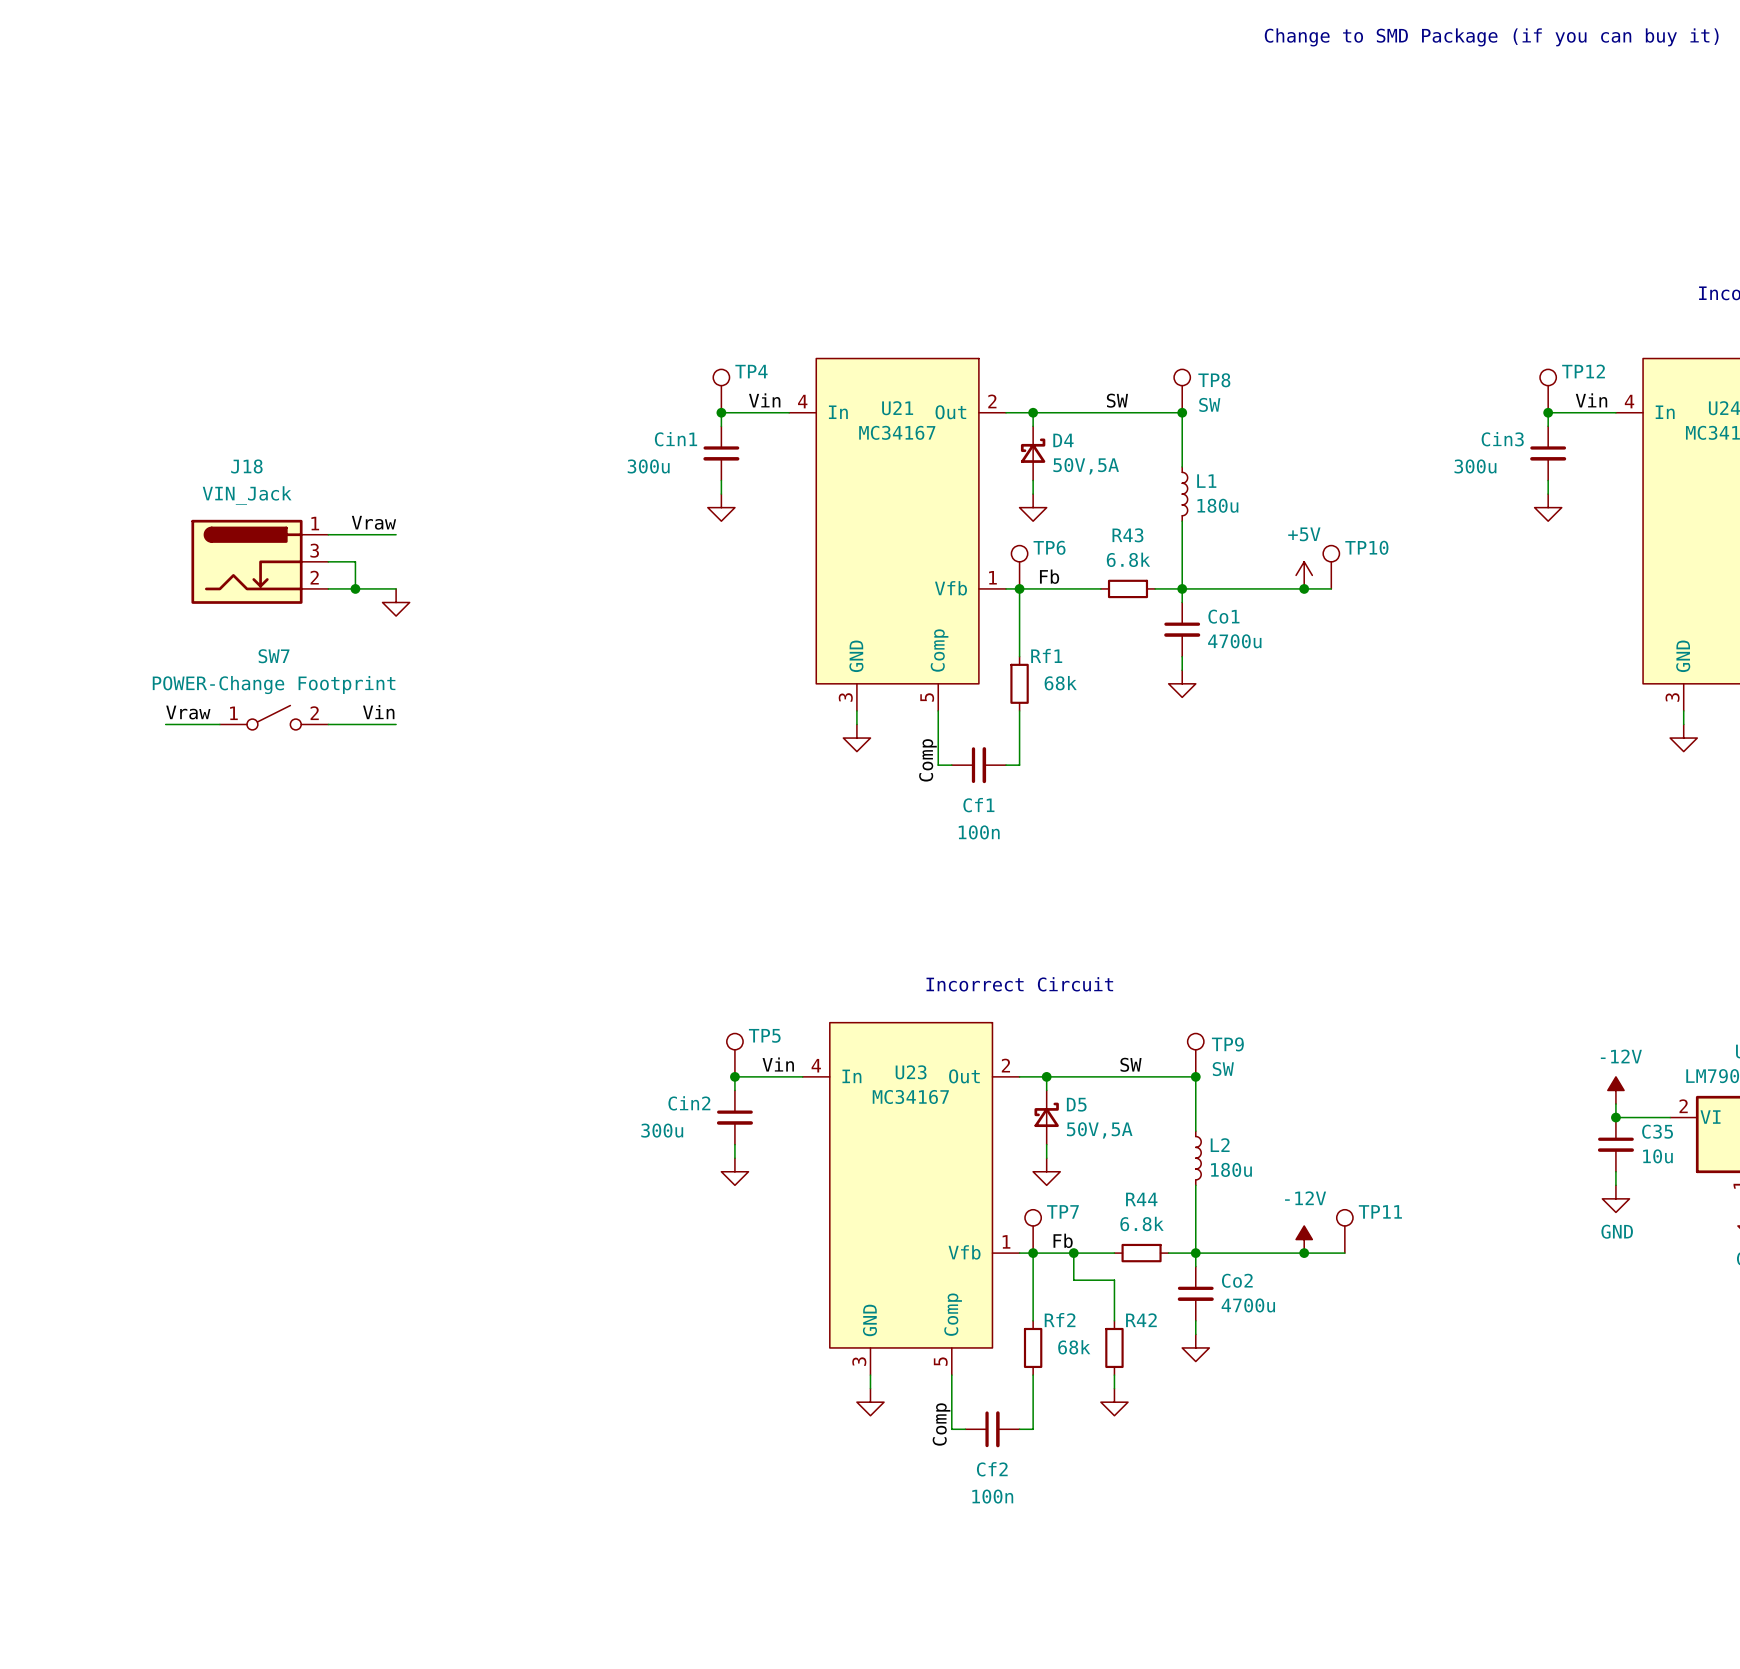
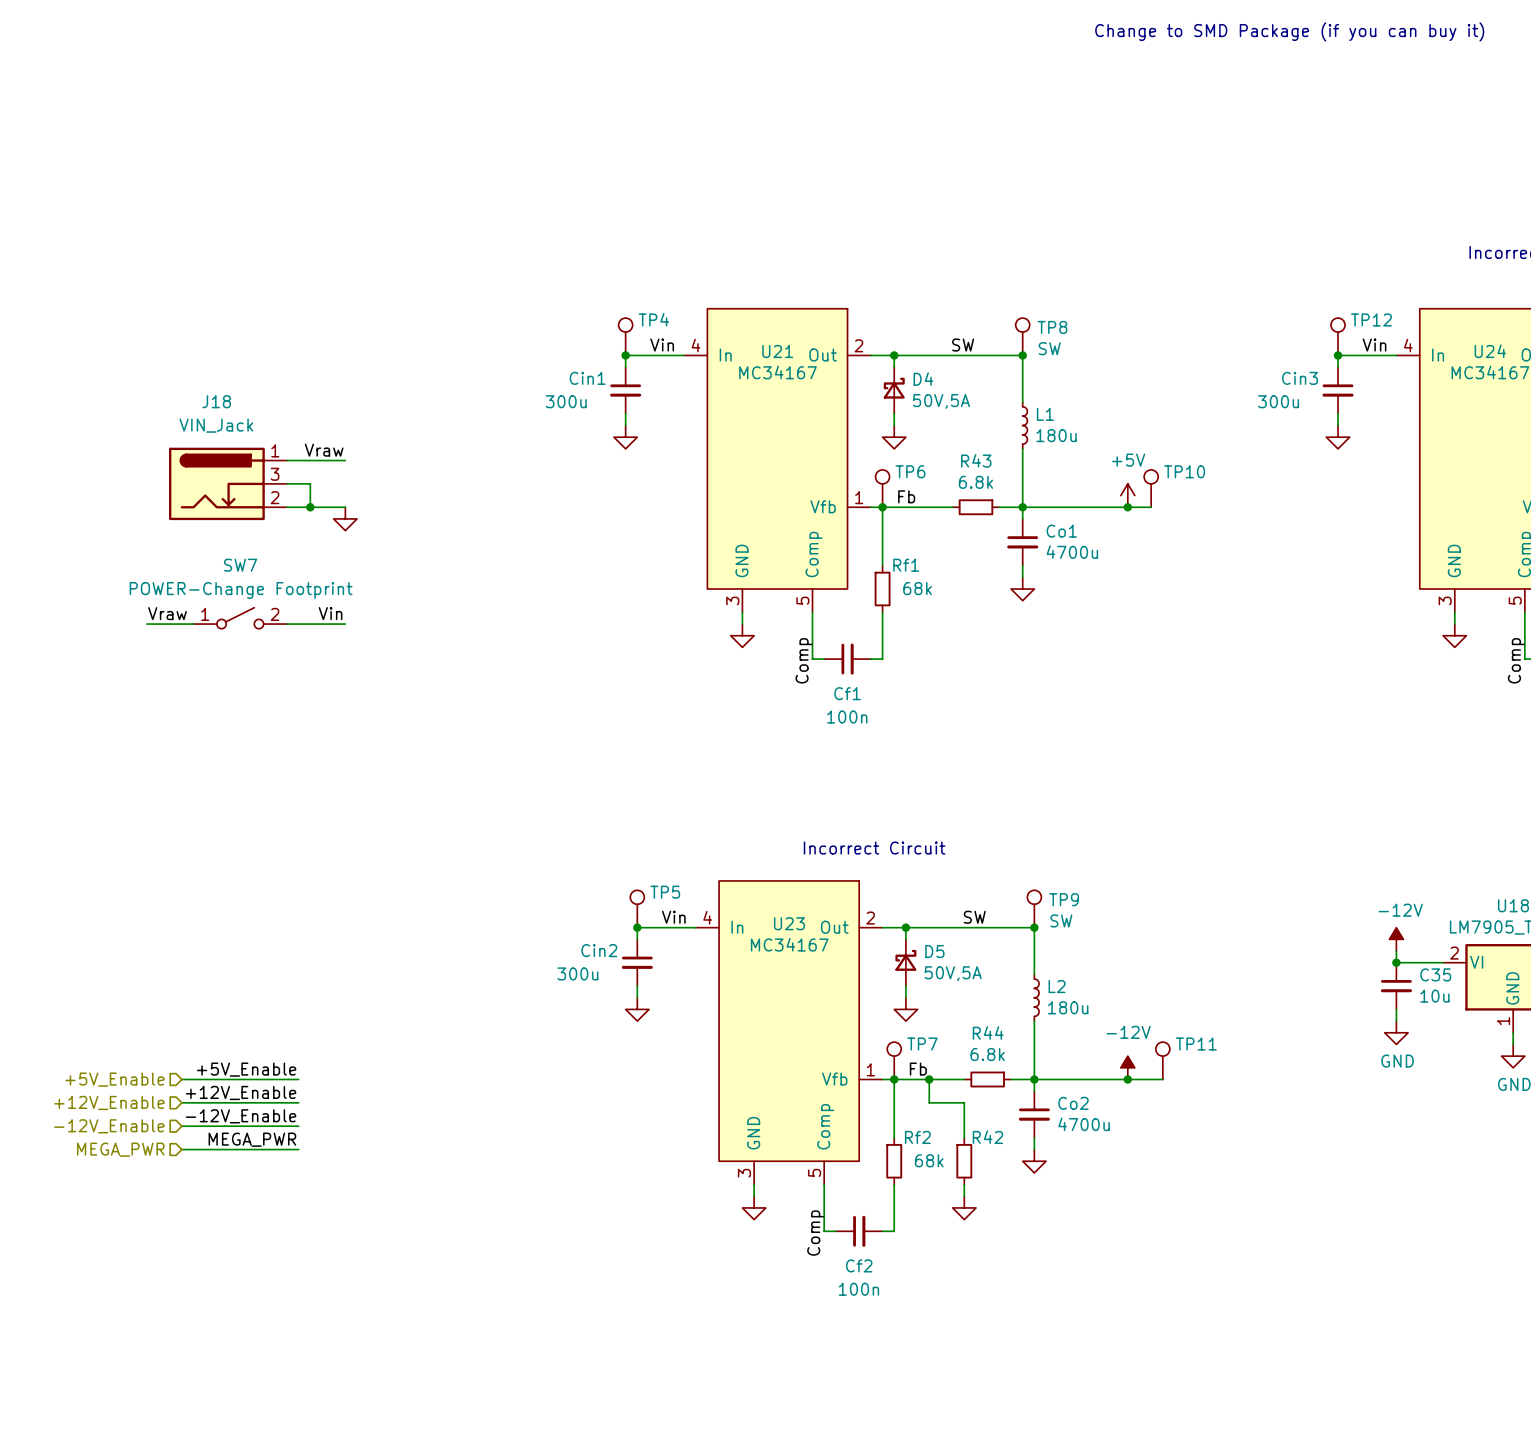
label: none -> +5V_Enable (246, 1069)
wire: none -> (181, 1079) (298, 1079)
hierarchical label: none -> +5V_Enable (114, 1079)
label: none -> +12V_Enable (241, 1092)
wire: none -> (181, 1102) (298, 1102)
hierarchical label: none -> +12V_Enable (109, 1102)
label: none -> -12V_Enable (241, 1116)
wire: none -> (181, 1126) (298, 1126)
hierarchical label: none -> -12V_Enable (109, 1126)
label: none -> MEGA_PWR (252, 1139)
wire: none -> (181, 1149) (298, 1149)
hierarchical label: none -> MEGA_PWR (120, 1149)

